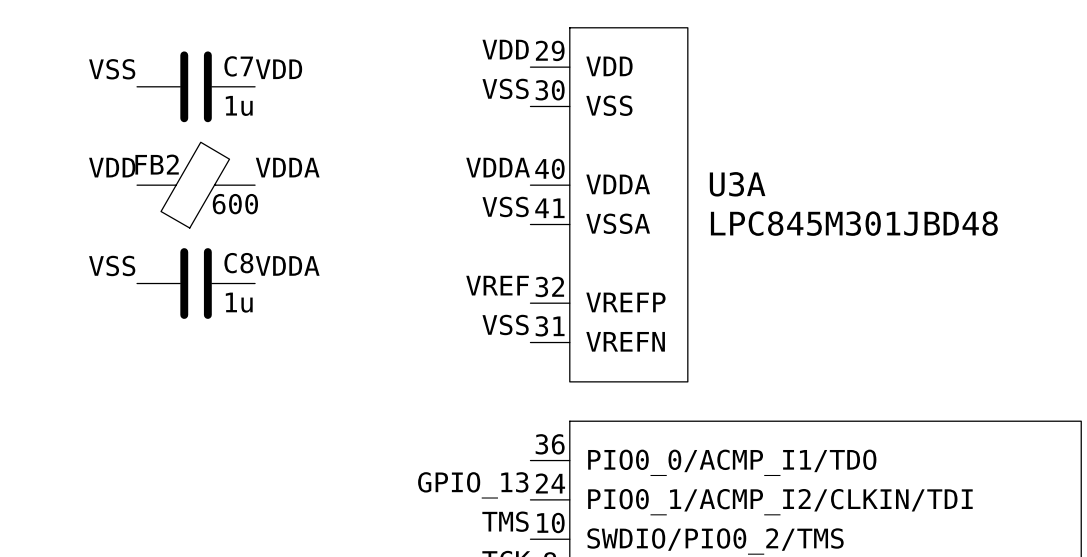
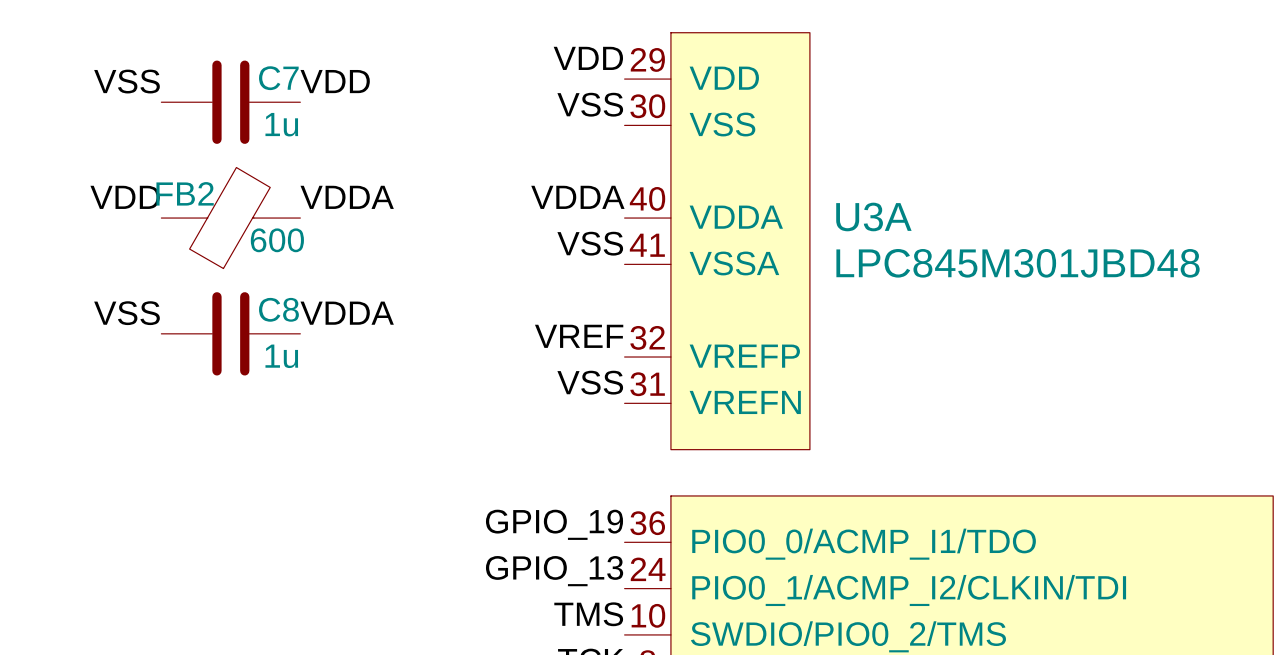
label: none -> GPIO_19 (554, 524)

